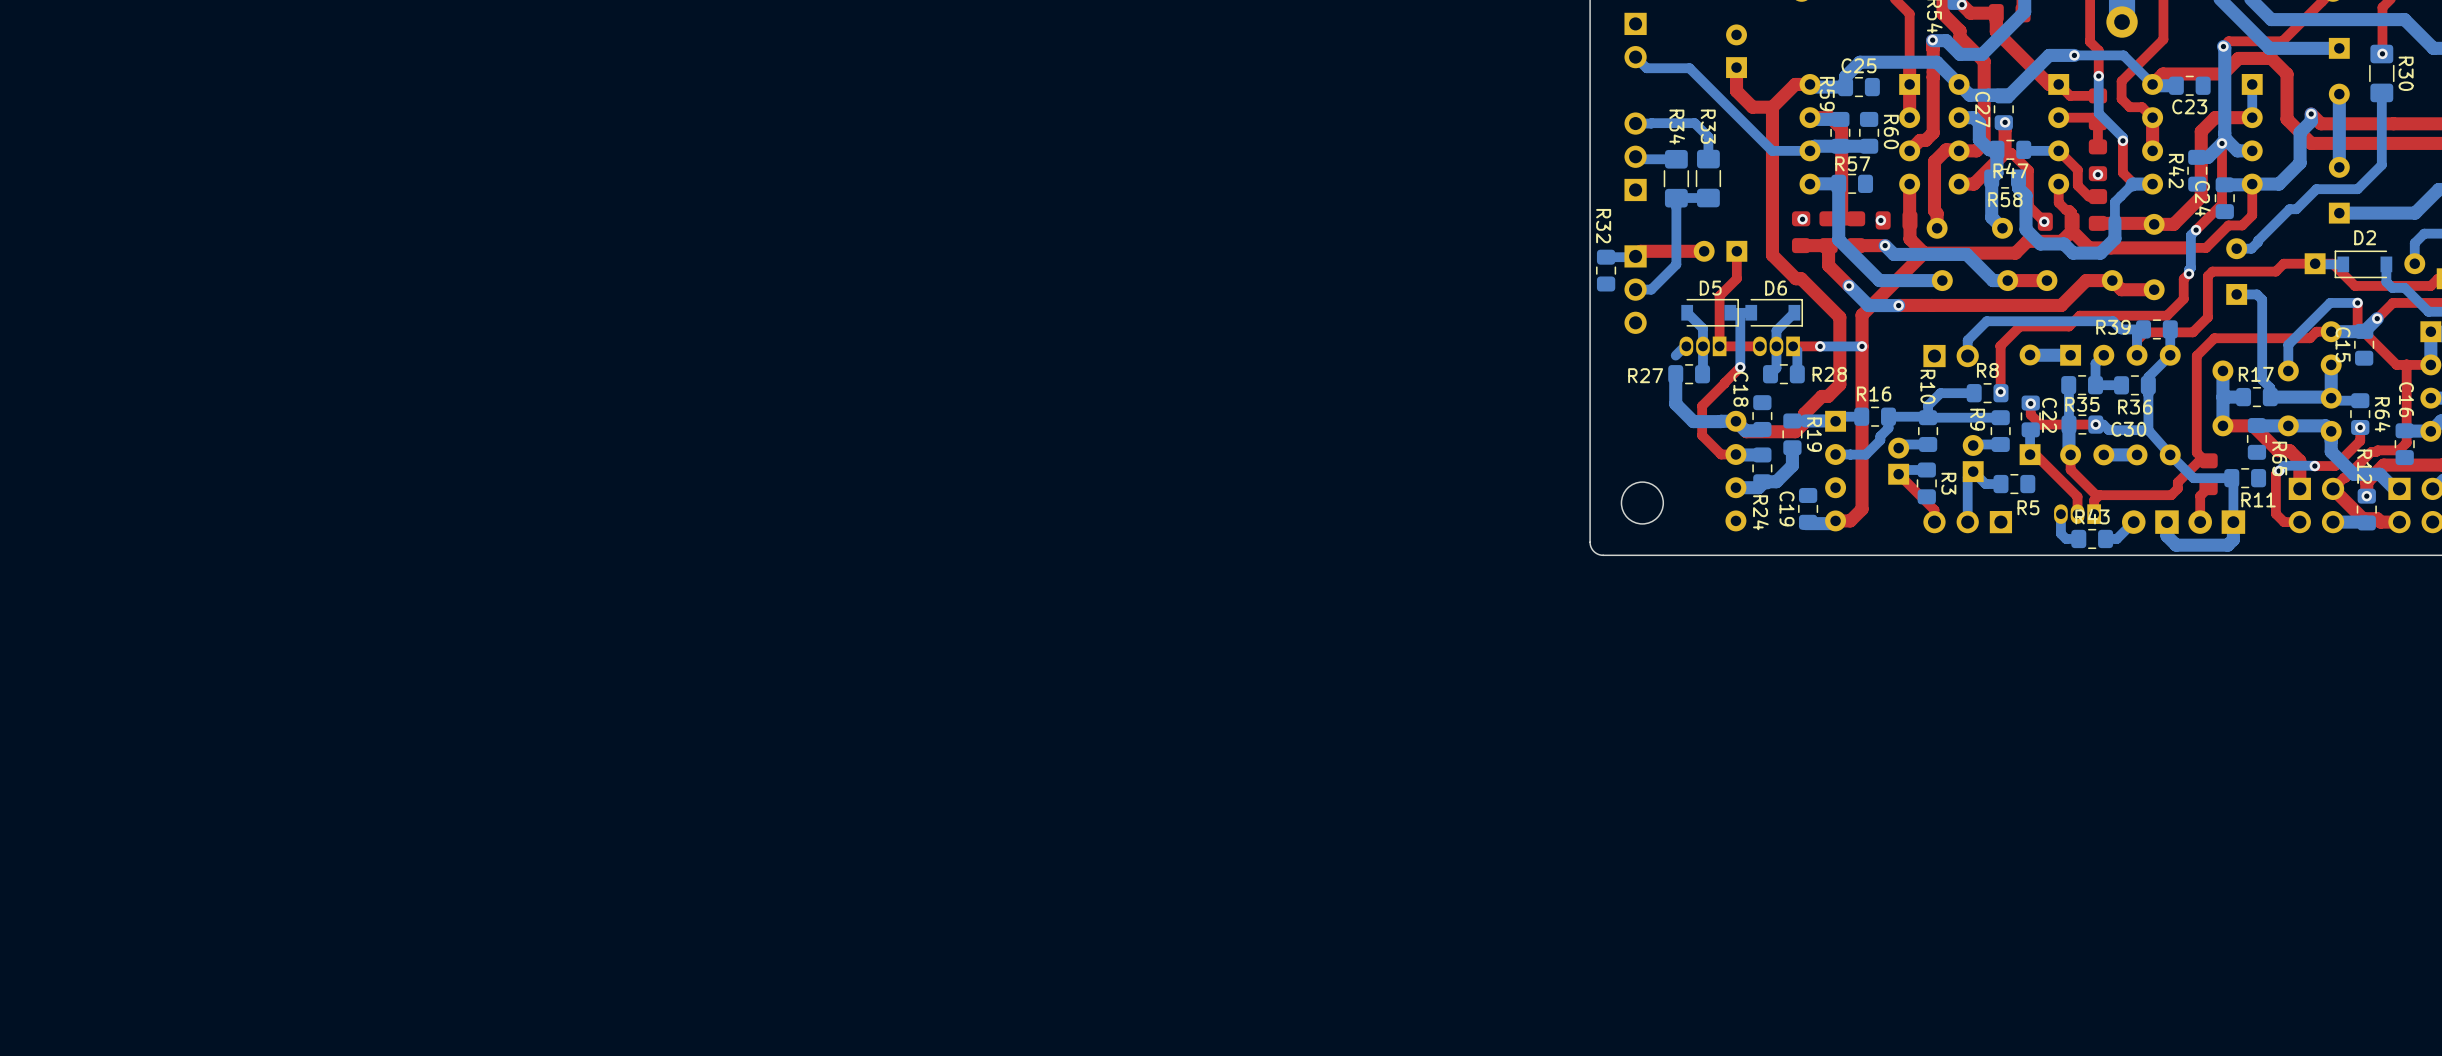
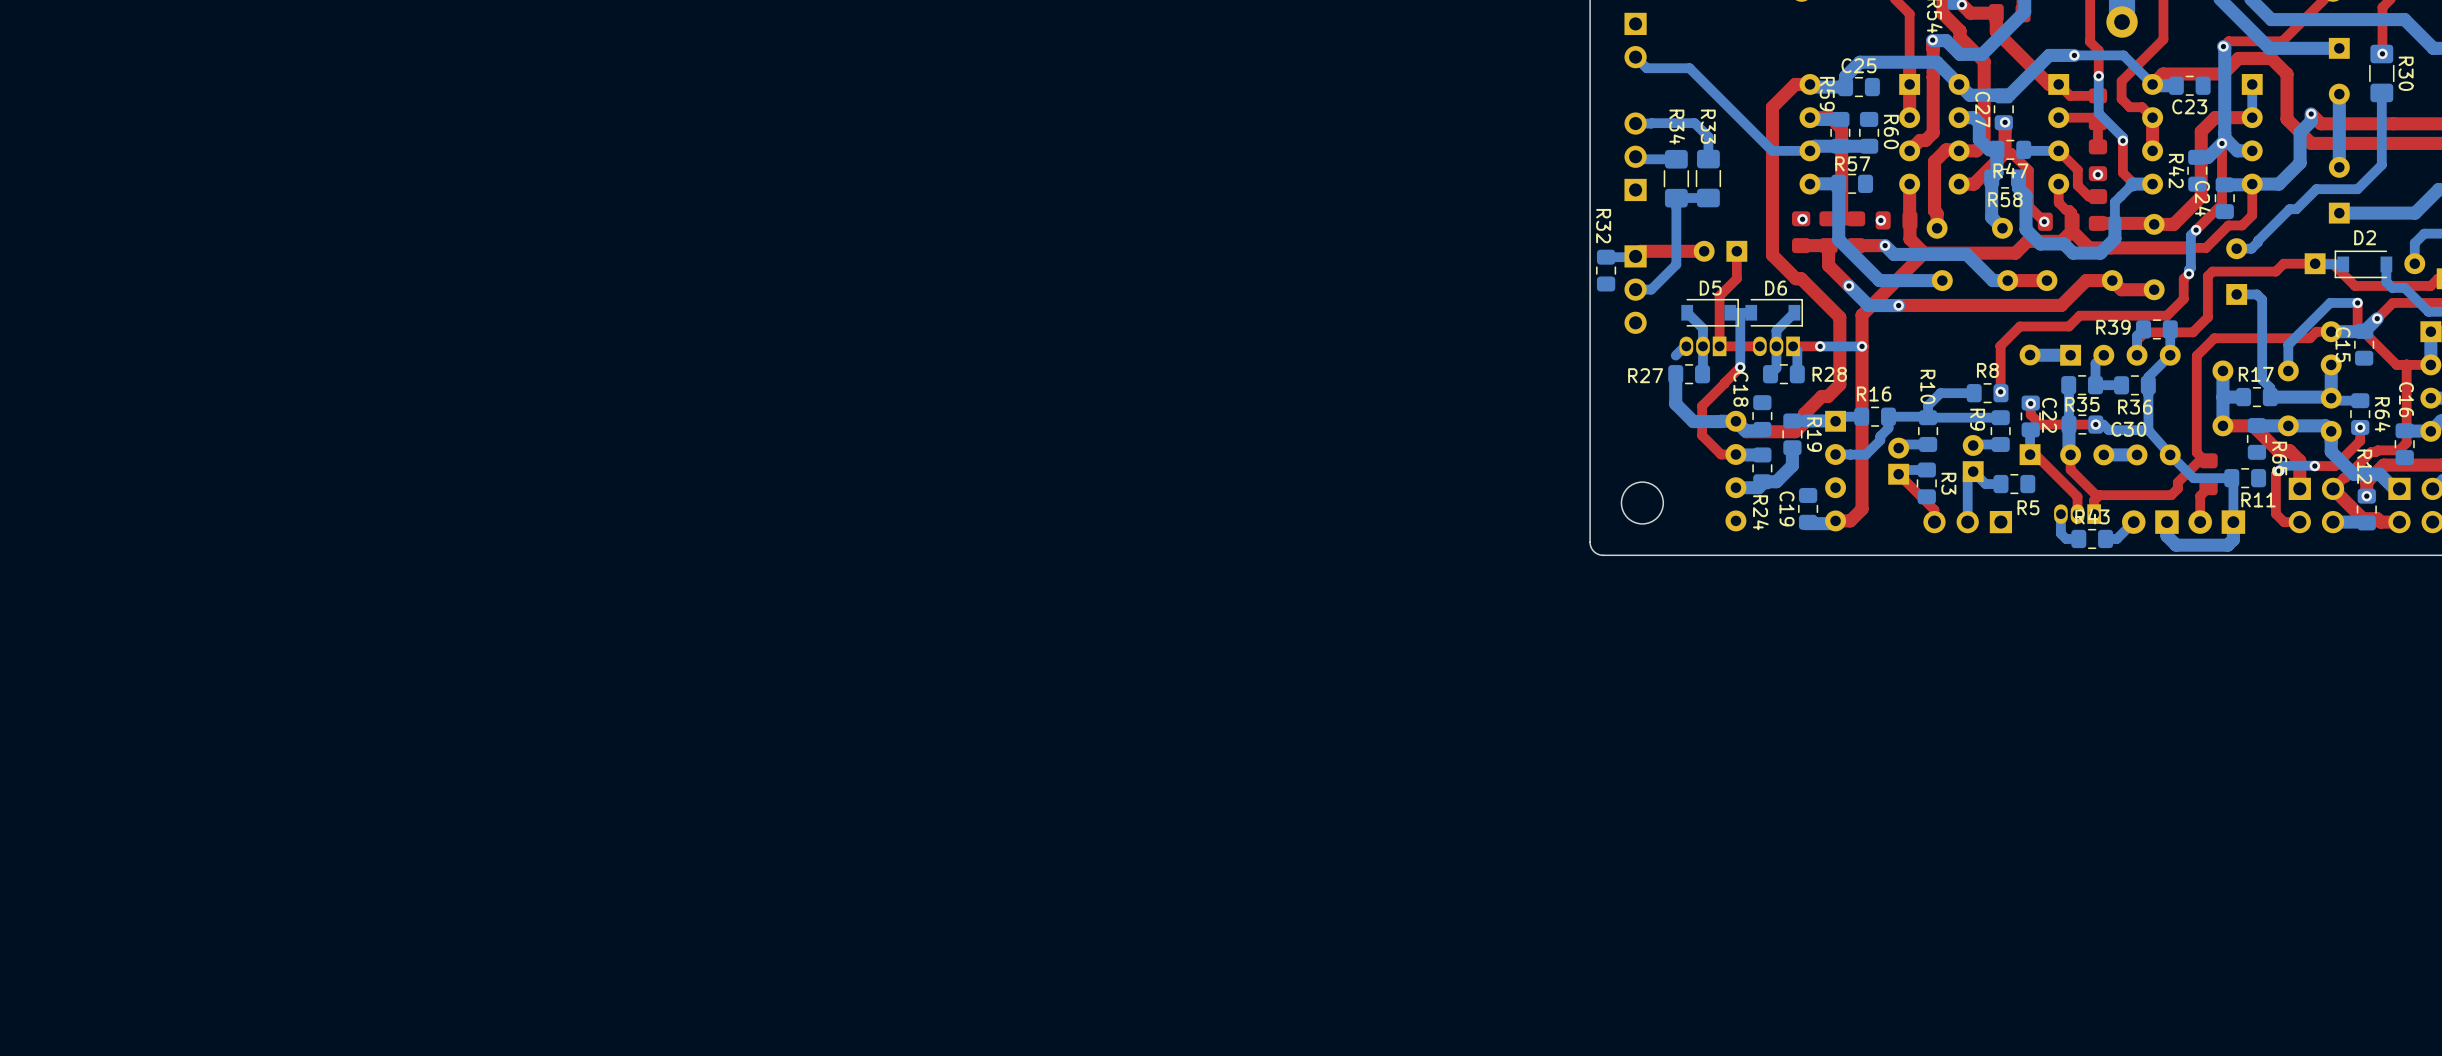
part: (1736, 51) -> none
top track: (1736, 67) (1736, 91) (1752, 107) (1772, 107) -> none
bottom track: (2143, 329) (2121, 329) (2113, 321) (1986, 321) (1967, 340) (1967, 356) -> none
part: (1951, 356) -> none

